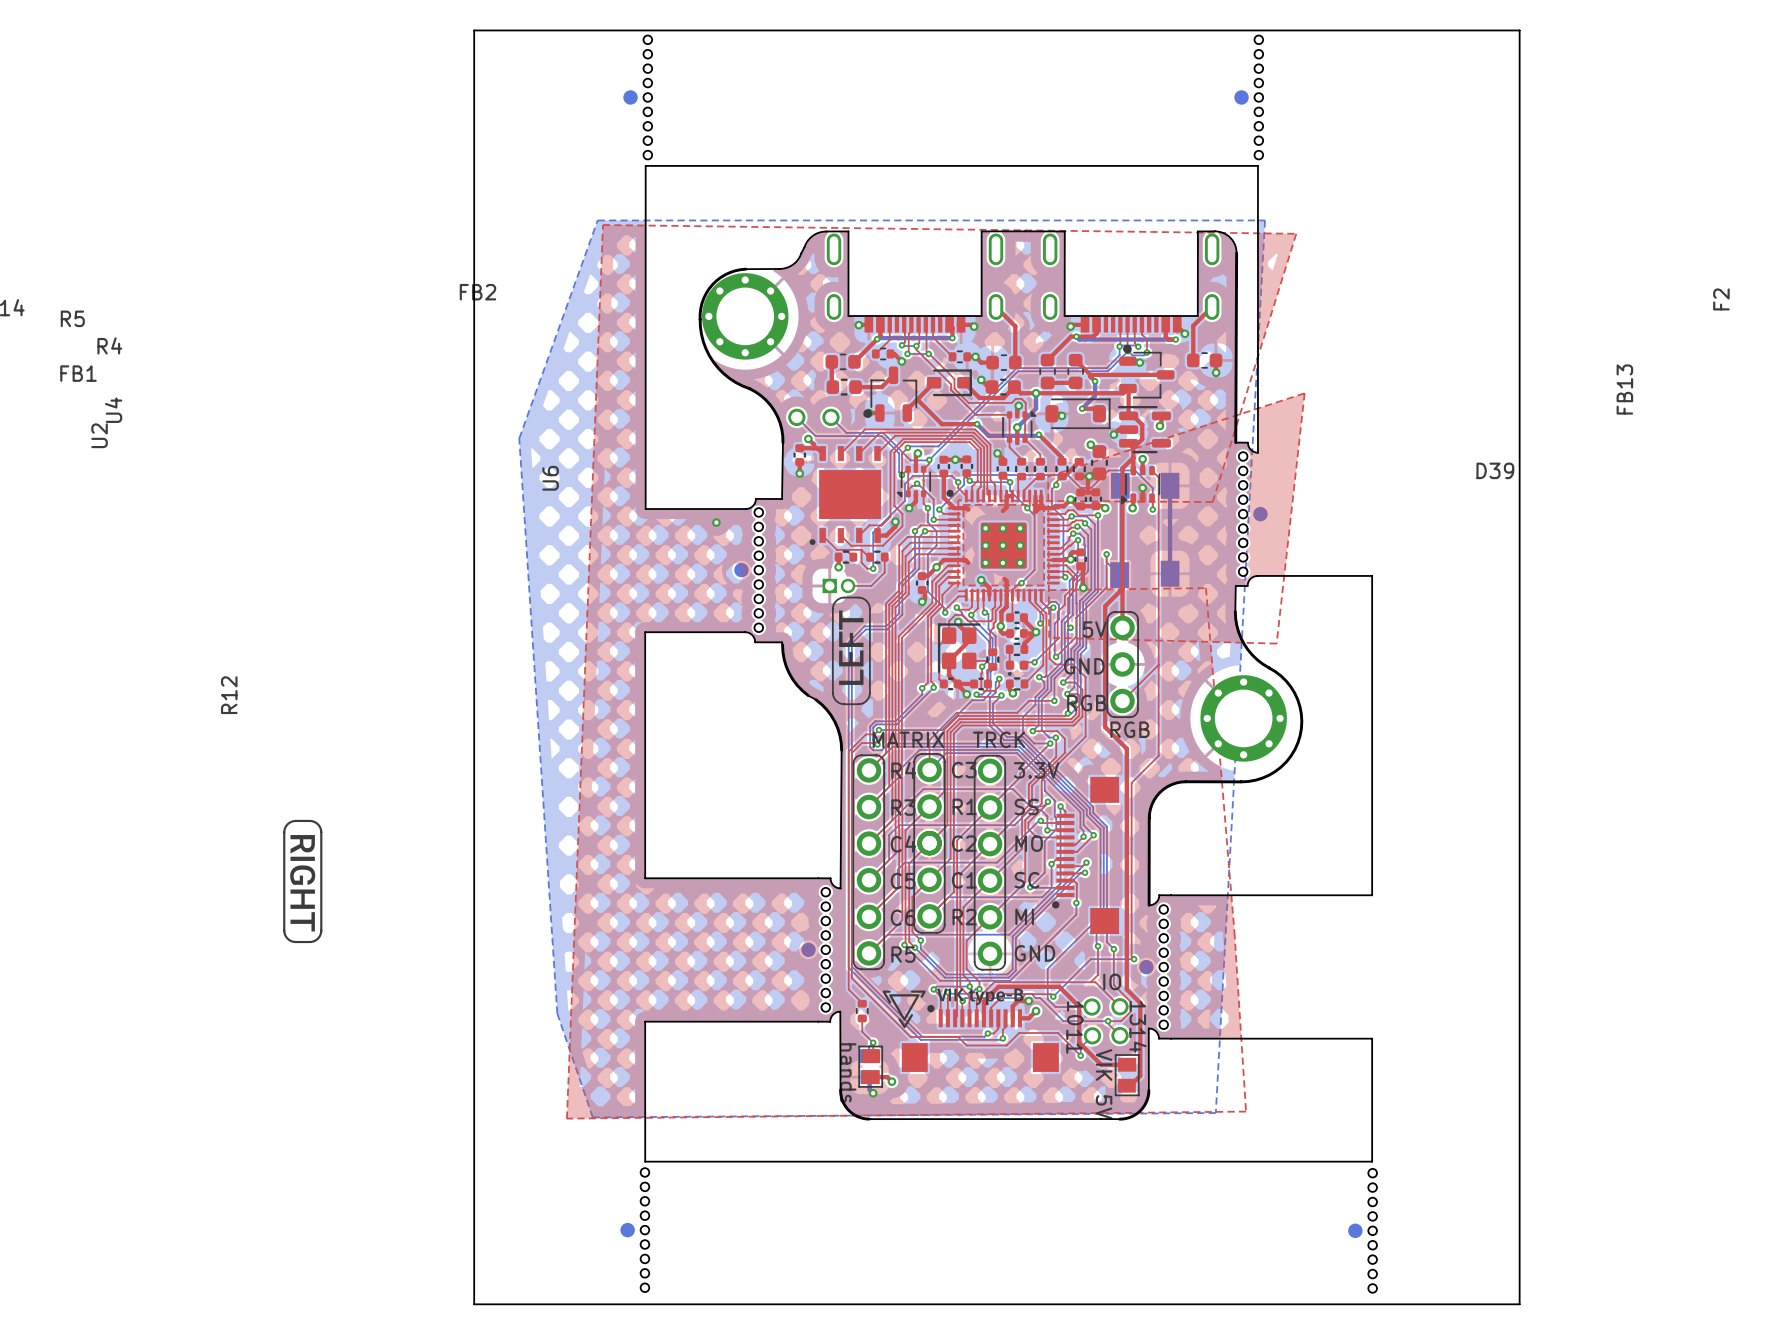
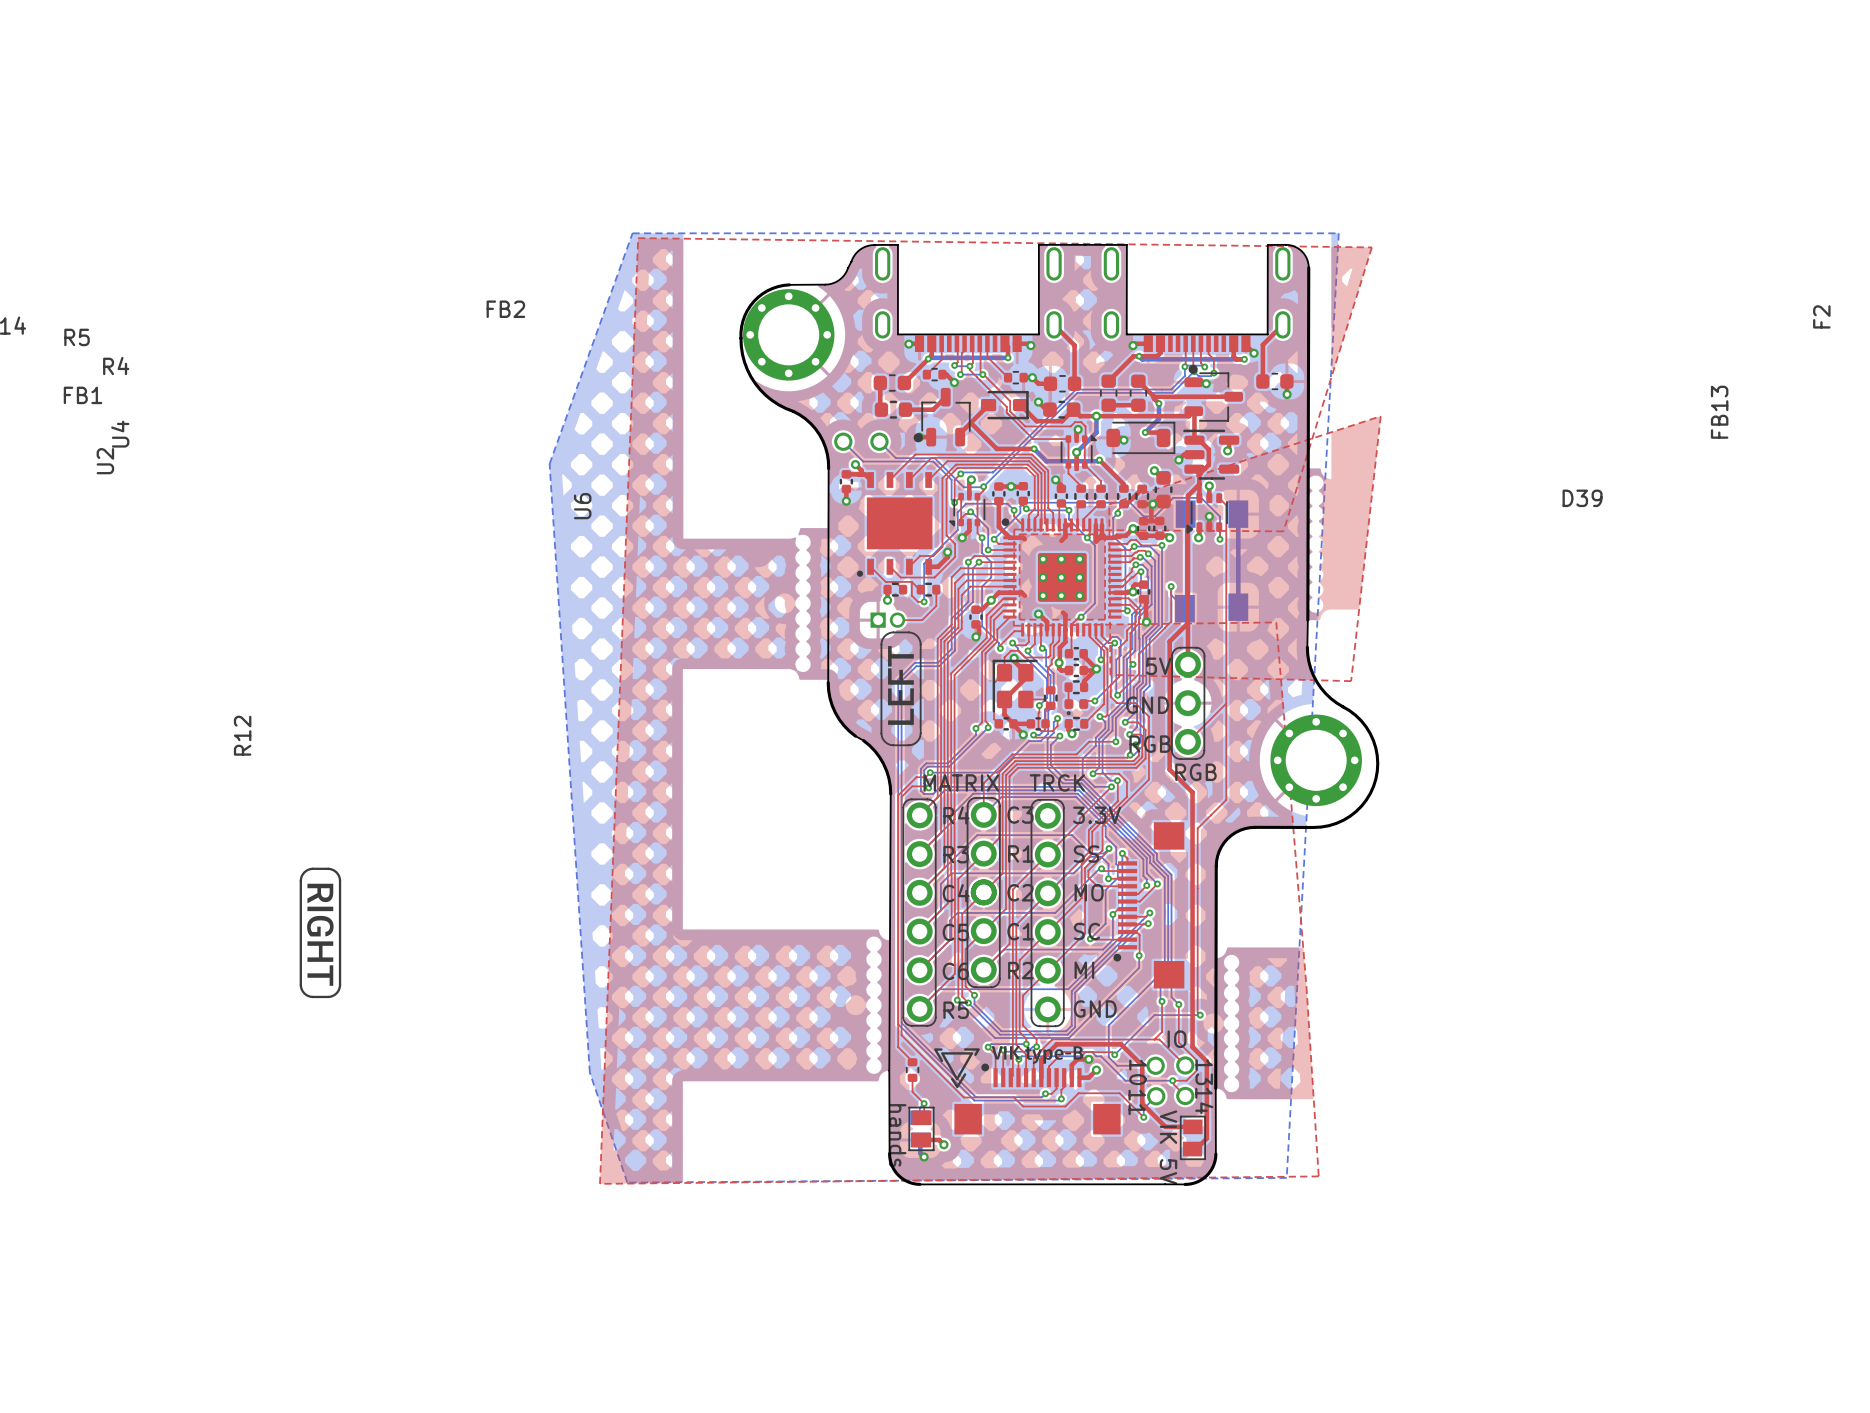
board edge: (474, 30) (1519, 30) (1519, 1304) (474, 1304) (474, 30) -> none
part: (637, 97) -> none
part: (1248, 97) -> none
board edge: (1236, 252) (1235, 442) (1247, 442) (1250, 449) (1258, 452) (1257, 165) (645, 165) (645, 509) (747, 508) (753, 505) (755, 498) -> (1308, 267) (1307, 620)
board edge: (782, 442) (782, 498) (755, 498) -> (828, 468) (828, 682)
part: (1253, 514) -> none
via: (716, 522) -> none
part: (748, 570) -> none
board edge: (1235, 585) (1247, 586) (1249, 579) (1256, 576) (1372, 575) (1372, 895) (1159, 895) (1156, 902) (1149, 905) (1149, 818) -> none
board edge: (782, 645) (782, 642) (755, 642) (752, 635) (746, 632) (645, 632) (645, 878) (830, 878) (833, 885) (840, 888) -> none
board edge: (841, 750) (840, 888) -> (890, 794) (889, 1070)
part: (815, 949) -> none
part: (1153, 967) -> none
board edge: (840, 1011) (833, 1014) (830, 1021) (645, 1021) (645, 1161) (1372, 1161) (1372, 1038) (1158, 1038) (1155, 1031) (1148, 1028) -> (1216, 866) (1215, 1088)
part: (634, 1230) -> none
part: (1362, 1230) -> none

